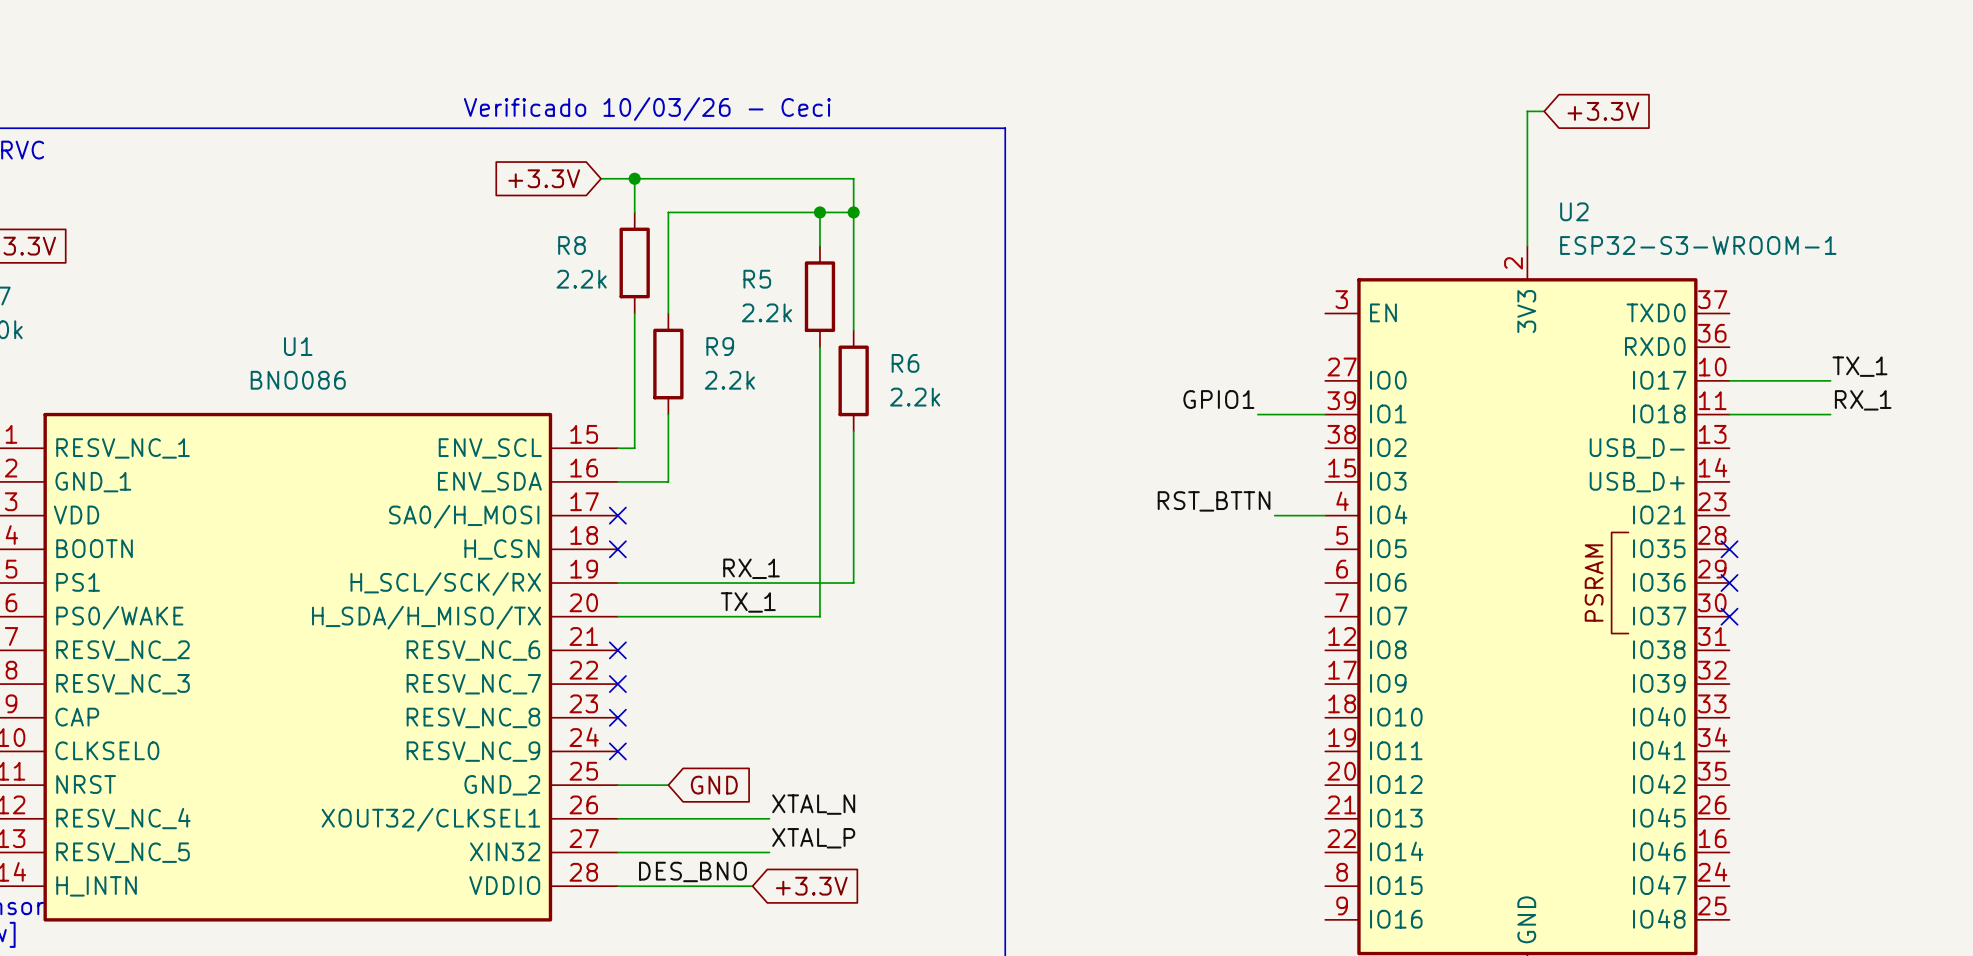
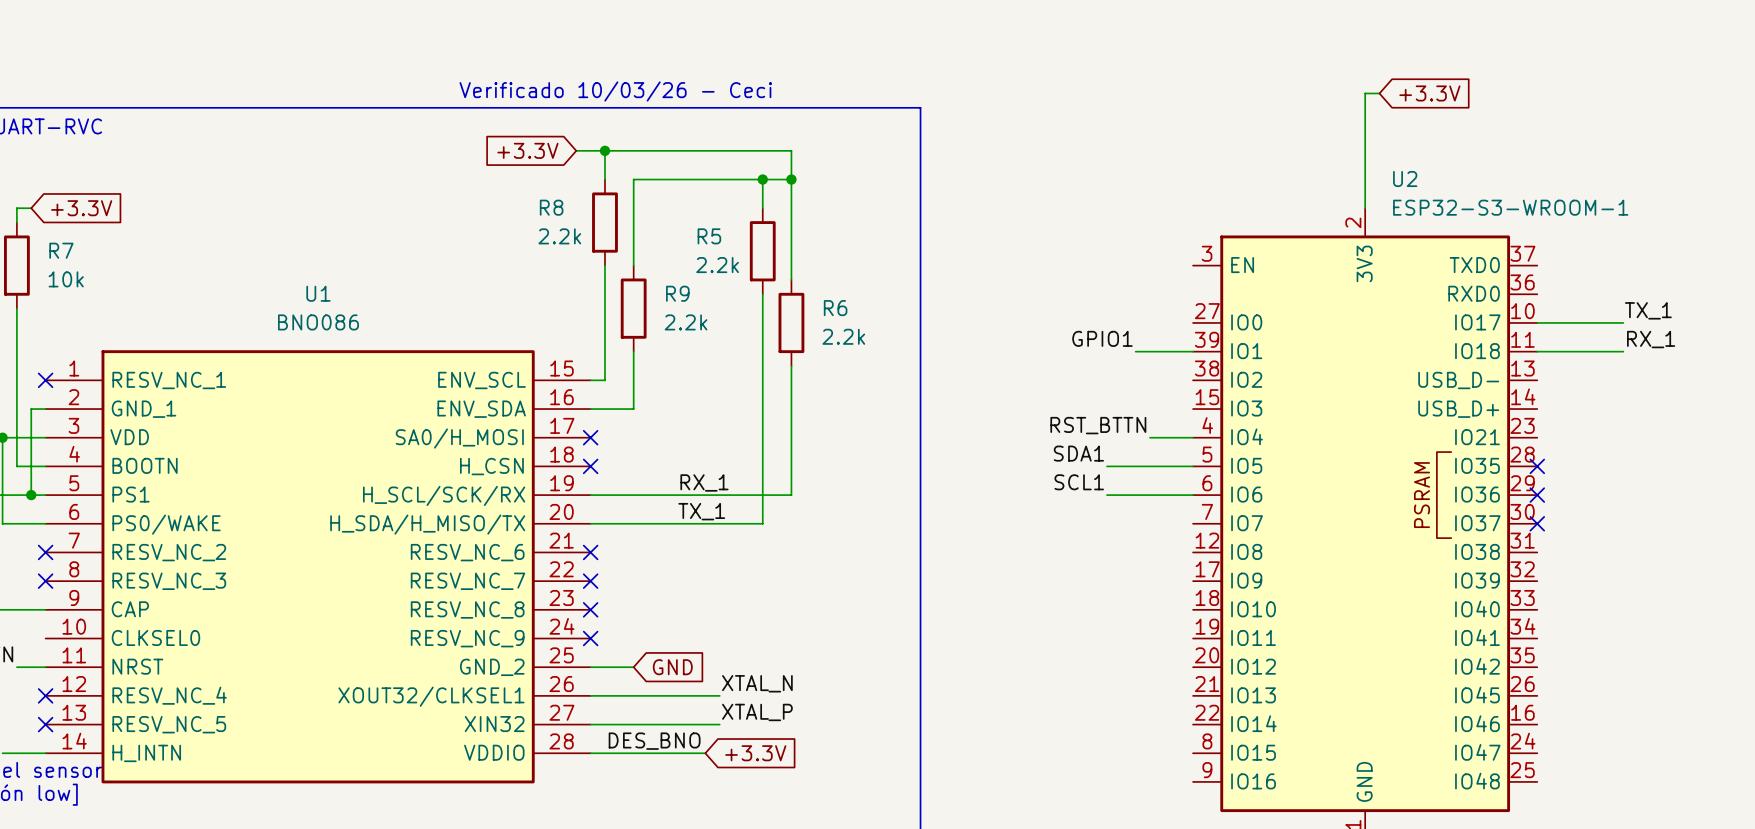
label: none -> SDA1 (1078, 453)
wire: none -> (1106, 466) (1193, 466)
label: none -> SCL1 (1079, 482)
wire: none -> (1106, 495) (1193, 495)

